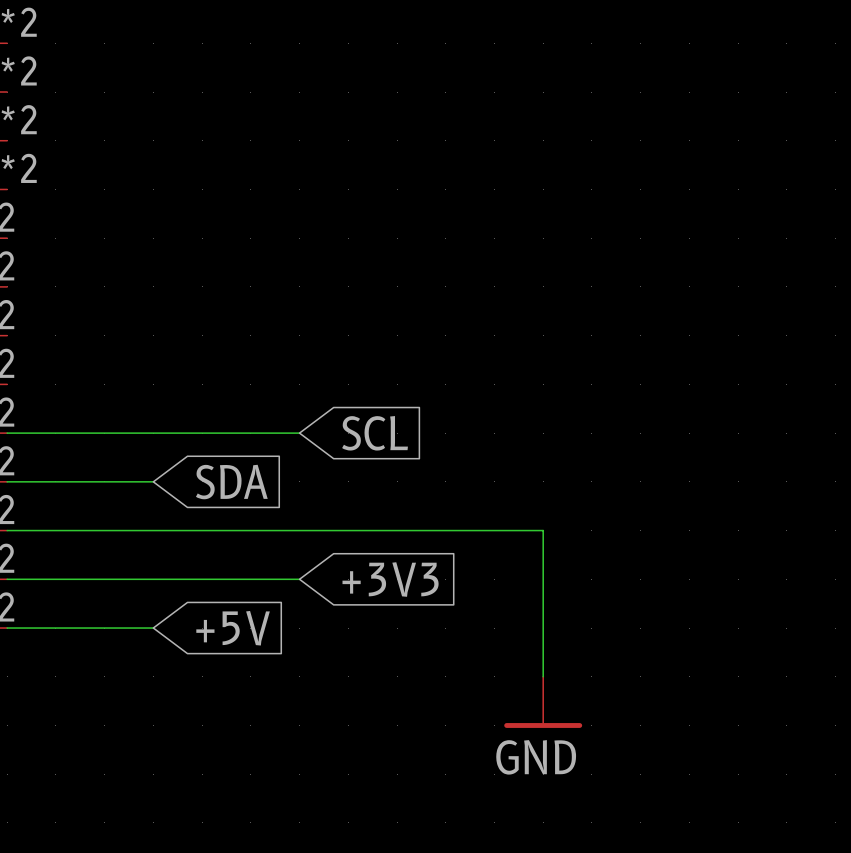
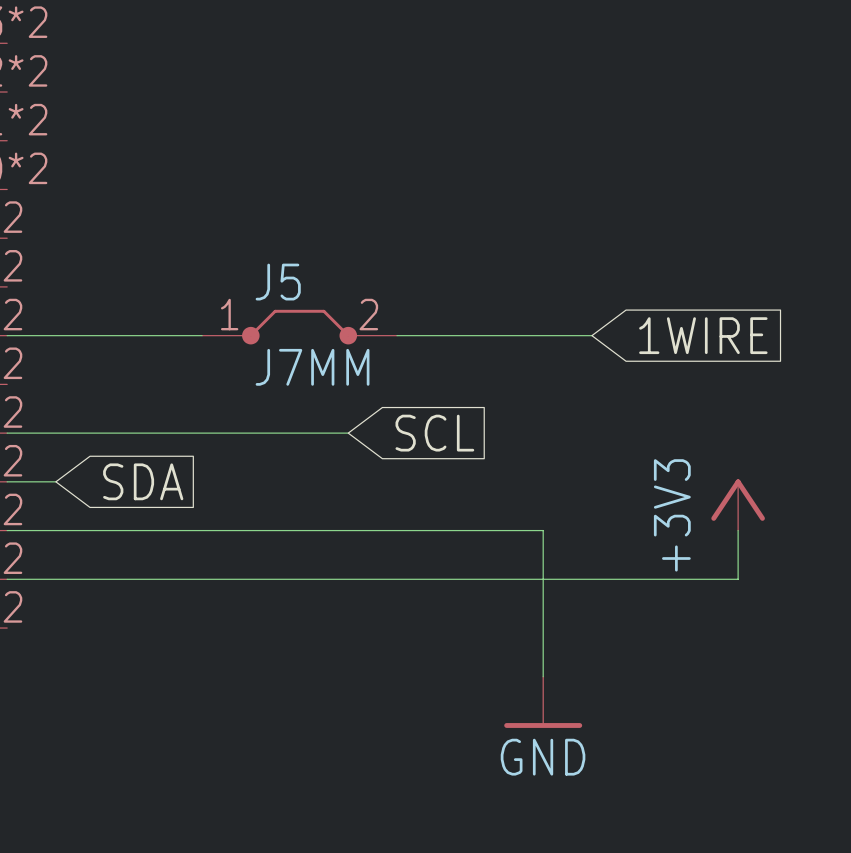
J5: none -> J7MM (299, 327)
wire: none -> (7, 335) (202, 335)
wire: none -> (397, 335) (591, 335)
global label: none -> 1WIRE (703, 335)
wire: none -> (299, 433) (348, 433)
global label position: SCL (375, 433) -> SCL (434, 433)
wire: (55, 481) (153, 481) -> none
global label position: SDA (231, 482) -> SDA (143, 481)
power symbol: none -> +3V3 (738, 504)
wire: none -> (738, 530) (738, 579) (299, 579)
global label: +3V3 (390, 579) -> none
wire: (7, 628) (153, 628) -> none
global label: +5V (233, 628) -> none

